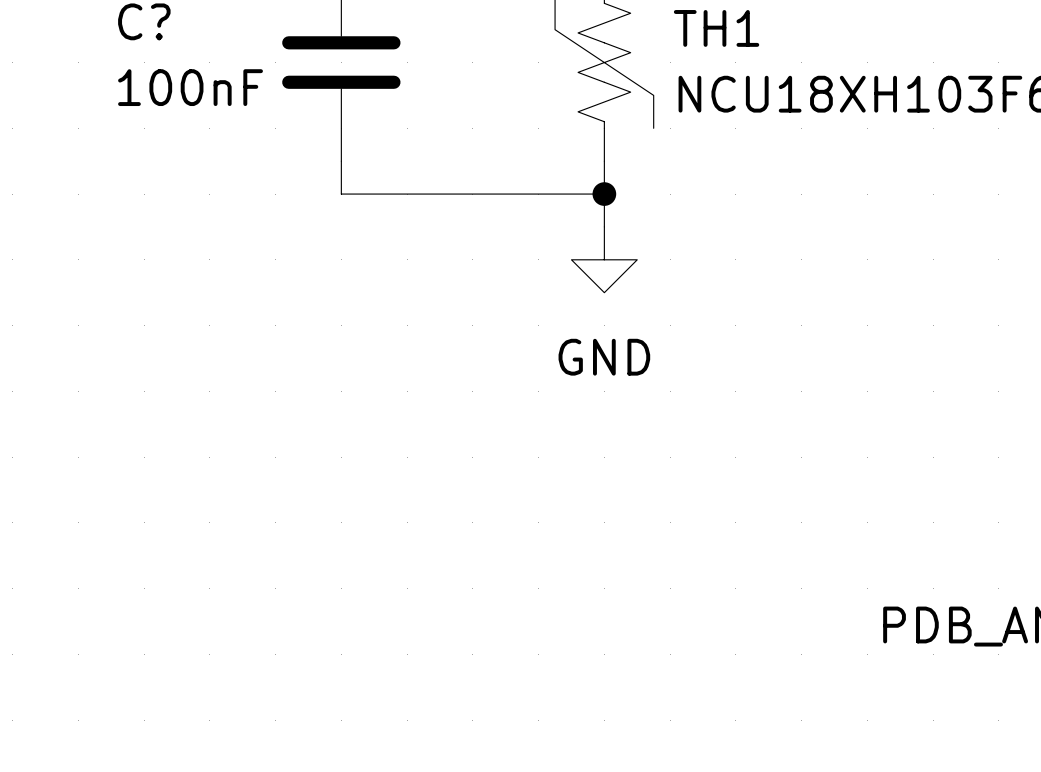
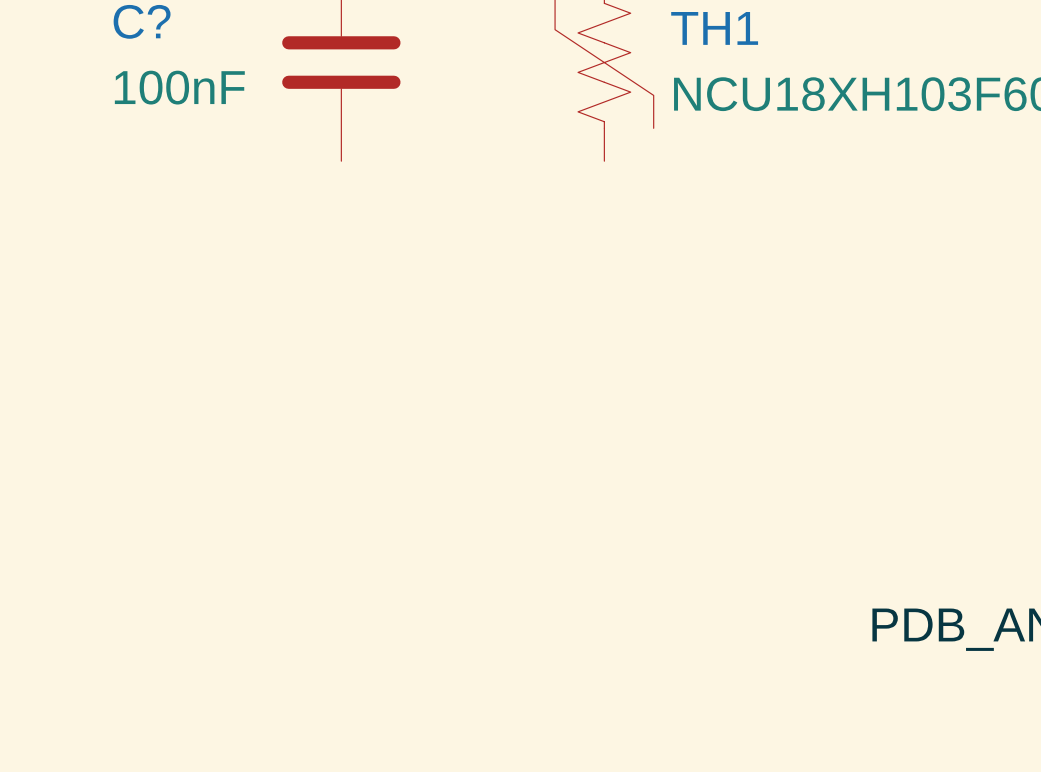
wire: (341, 161) (341, 194) (604, 194) -> none
wire: (604, 161) (604, 226) -> none
junction: (604, 194) -> none
power symbol: GND (604, 259) -> none

